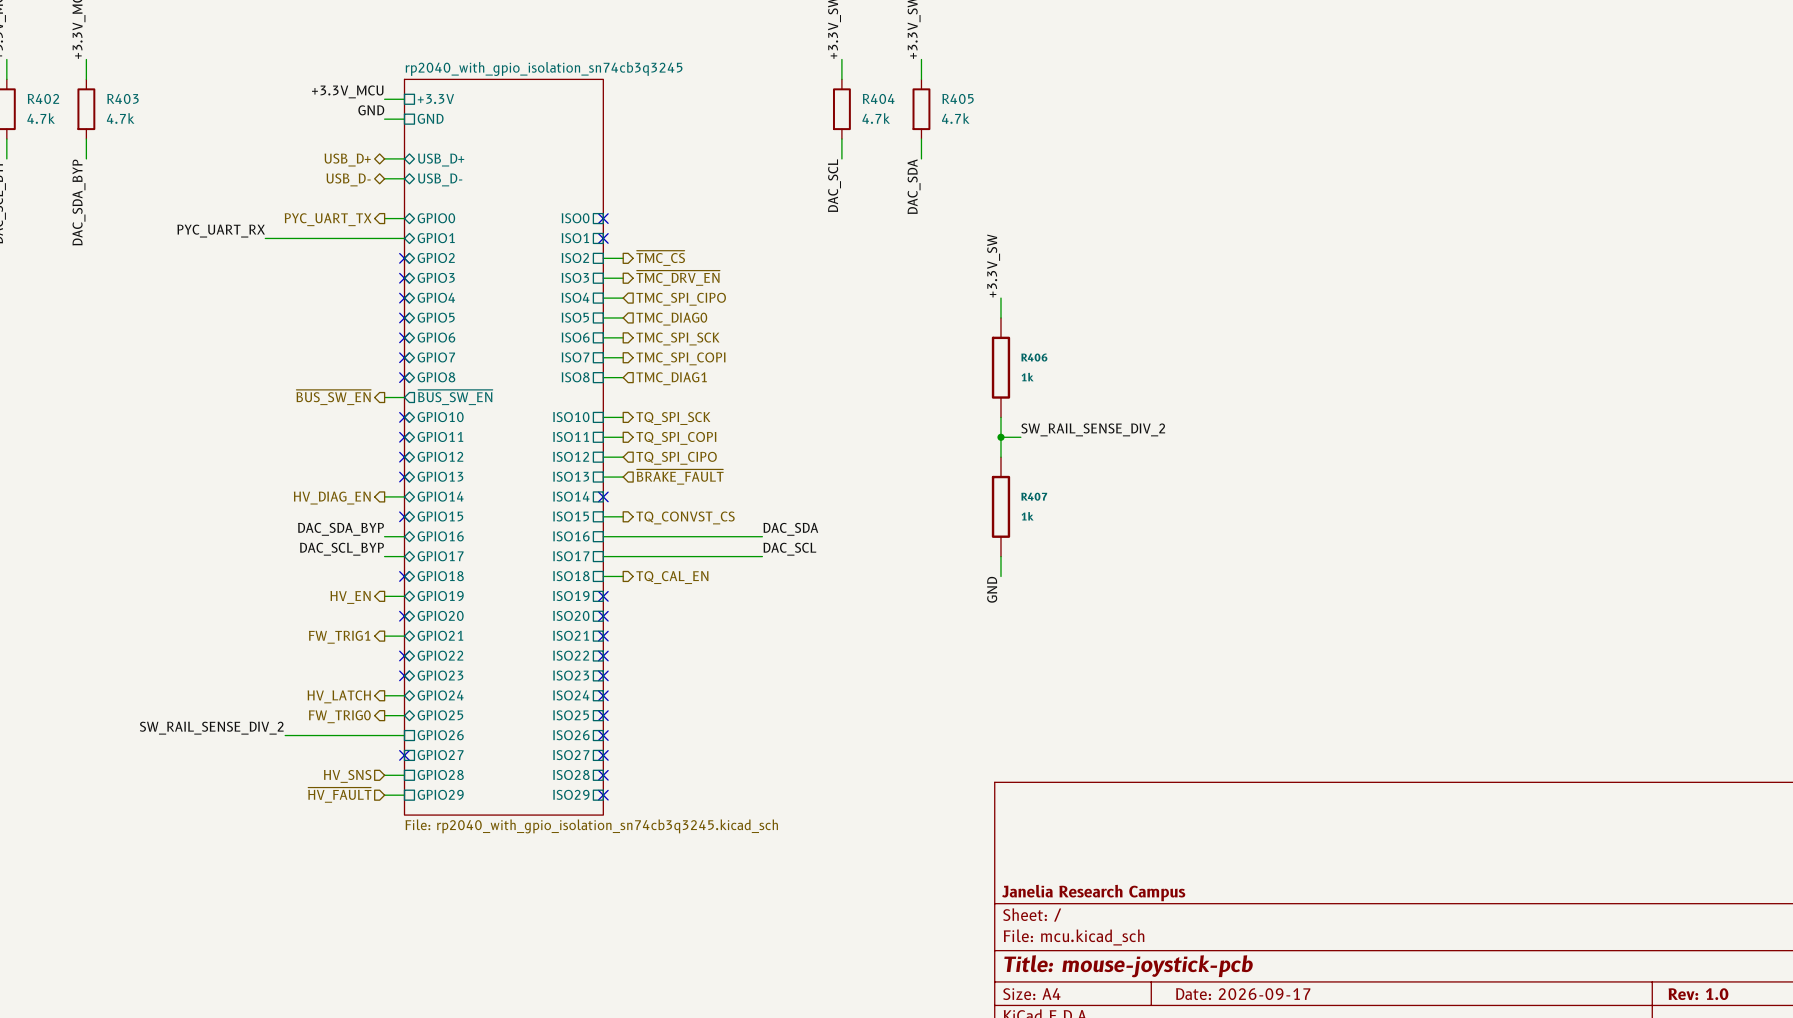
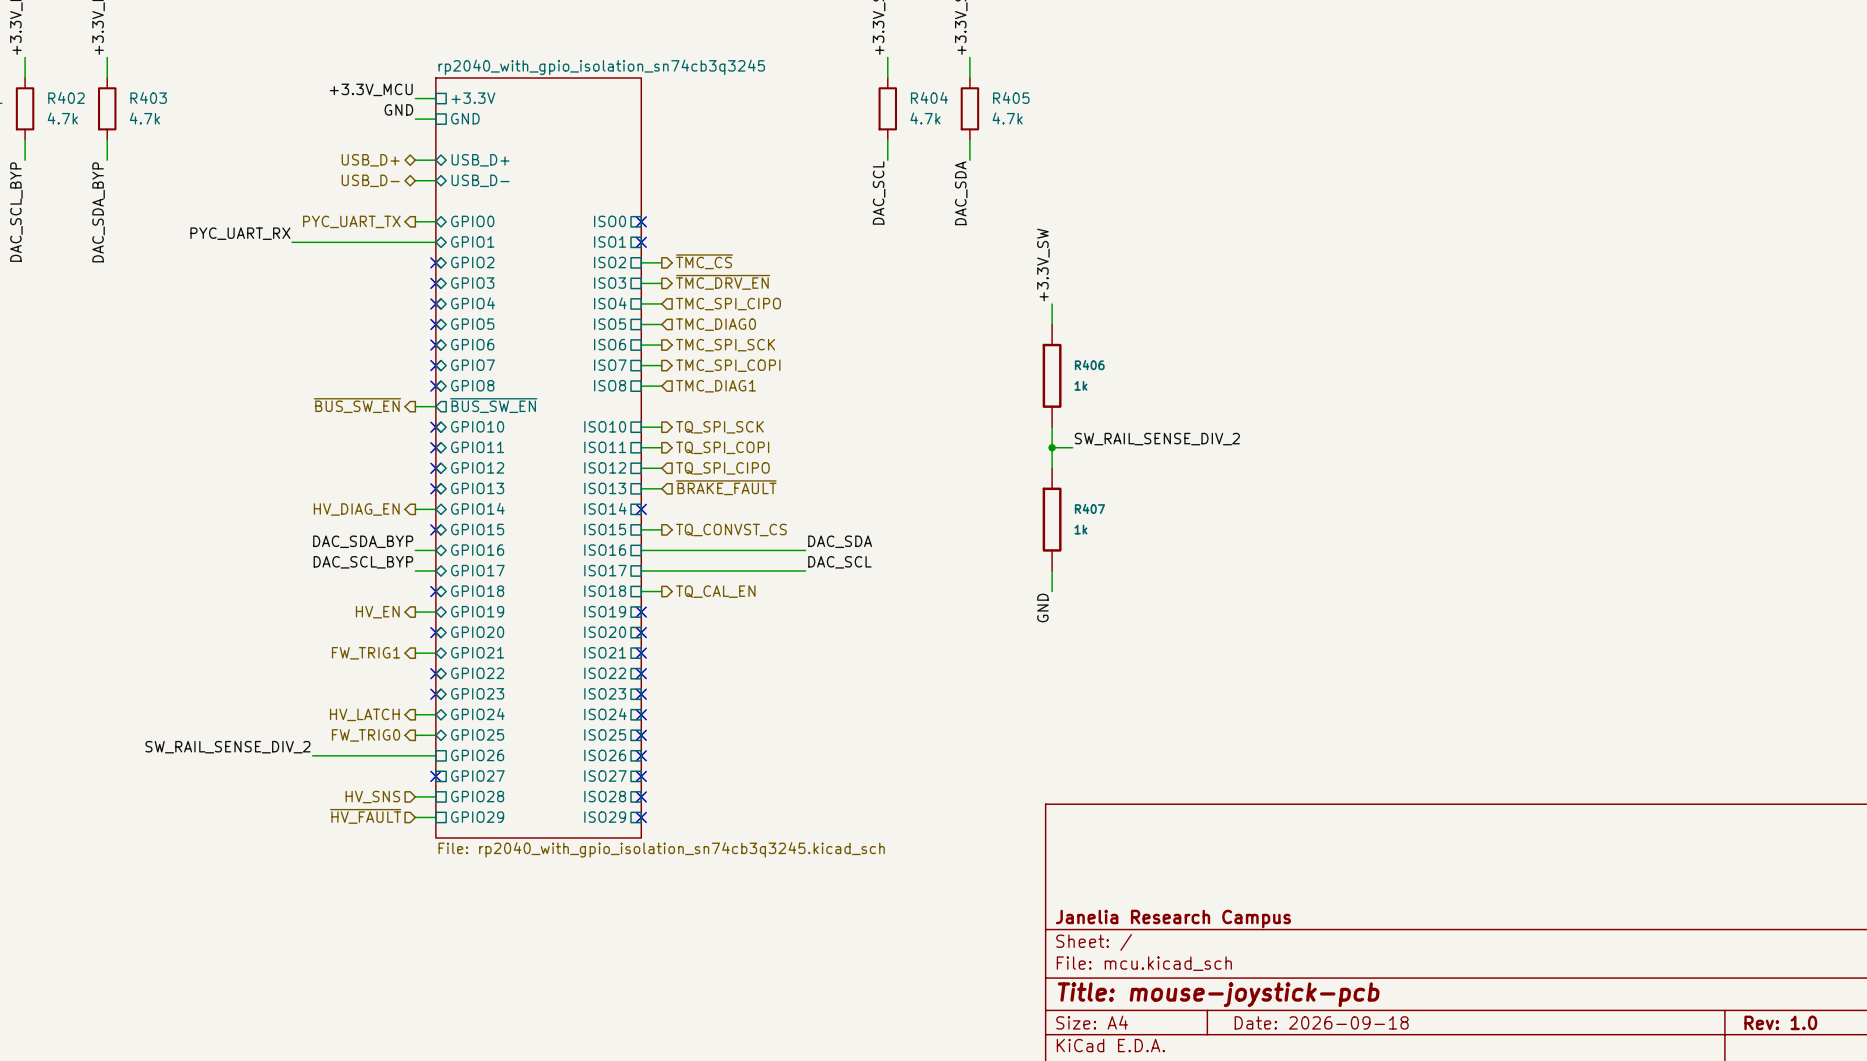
title block: Date: 2026-09-17 (1243, 994) -> Date: 2026-09-18 (1321, 1022)

